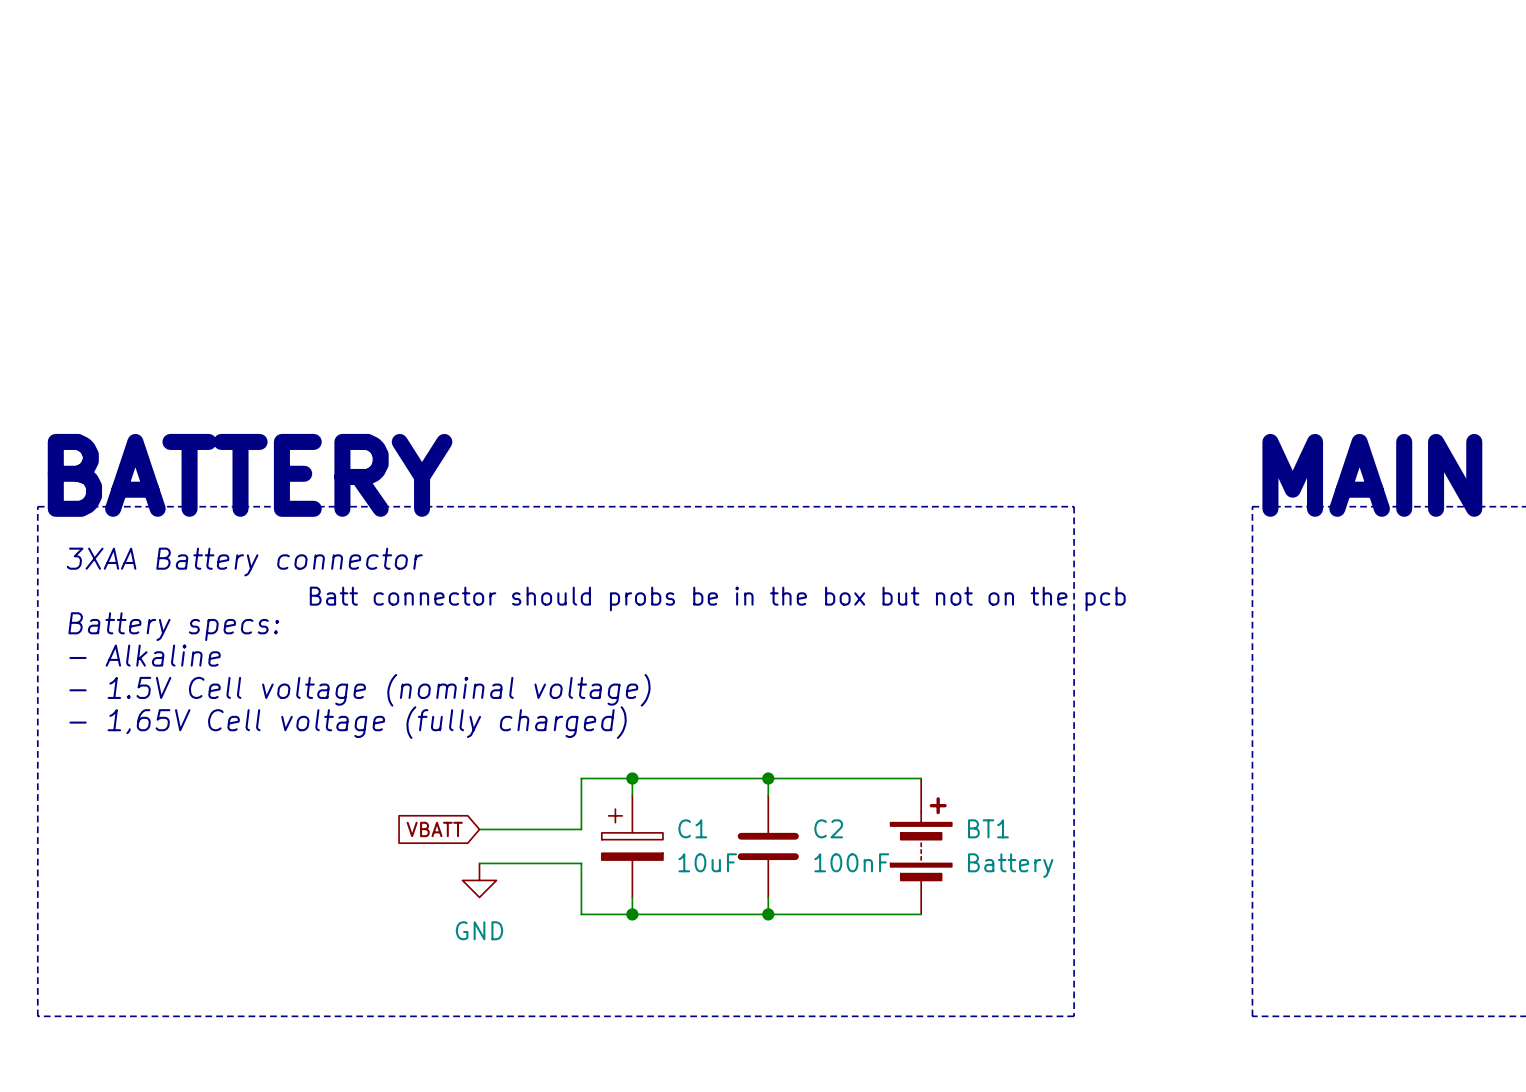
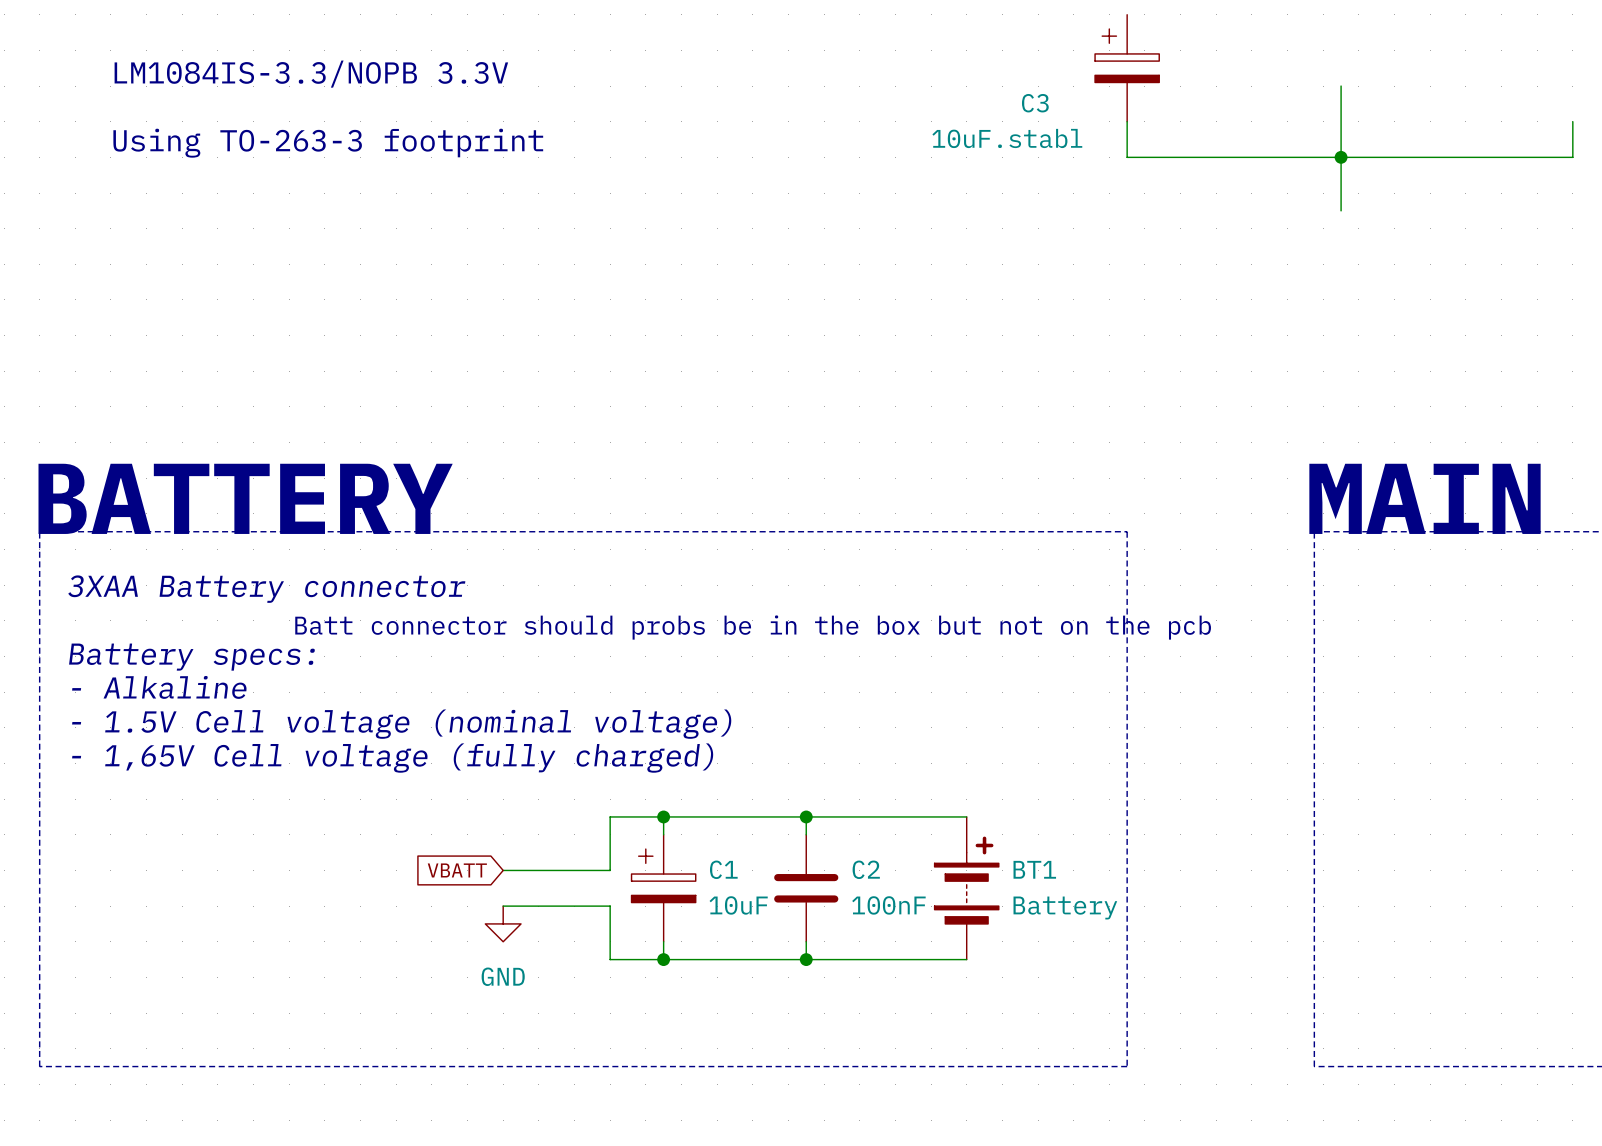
C3: none -> 10uF.stabl (1127, 68)
text: none -> LM1084IS-3.3/NOPB 3.3V (311, 74)
wire: none -> (1341, 86) (1341, 210)
wire: none -> (1127, 121) (1127, 157) (1572, 157) (1572, 121)
text: none -> Using TO-263-3 footprint (328, 143)
junction: none -> (1341, 157)

